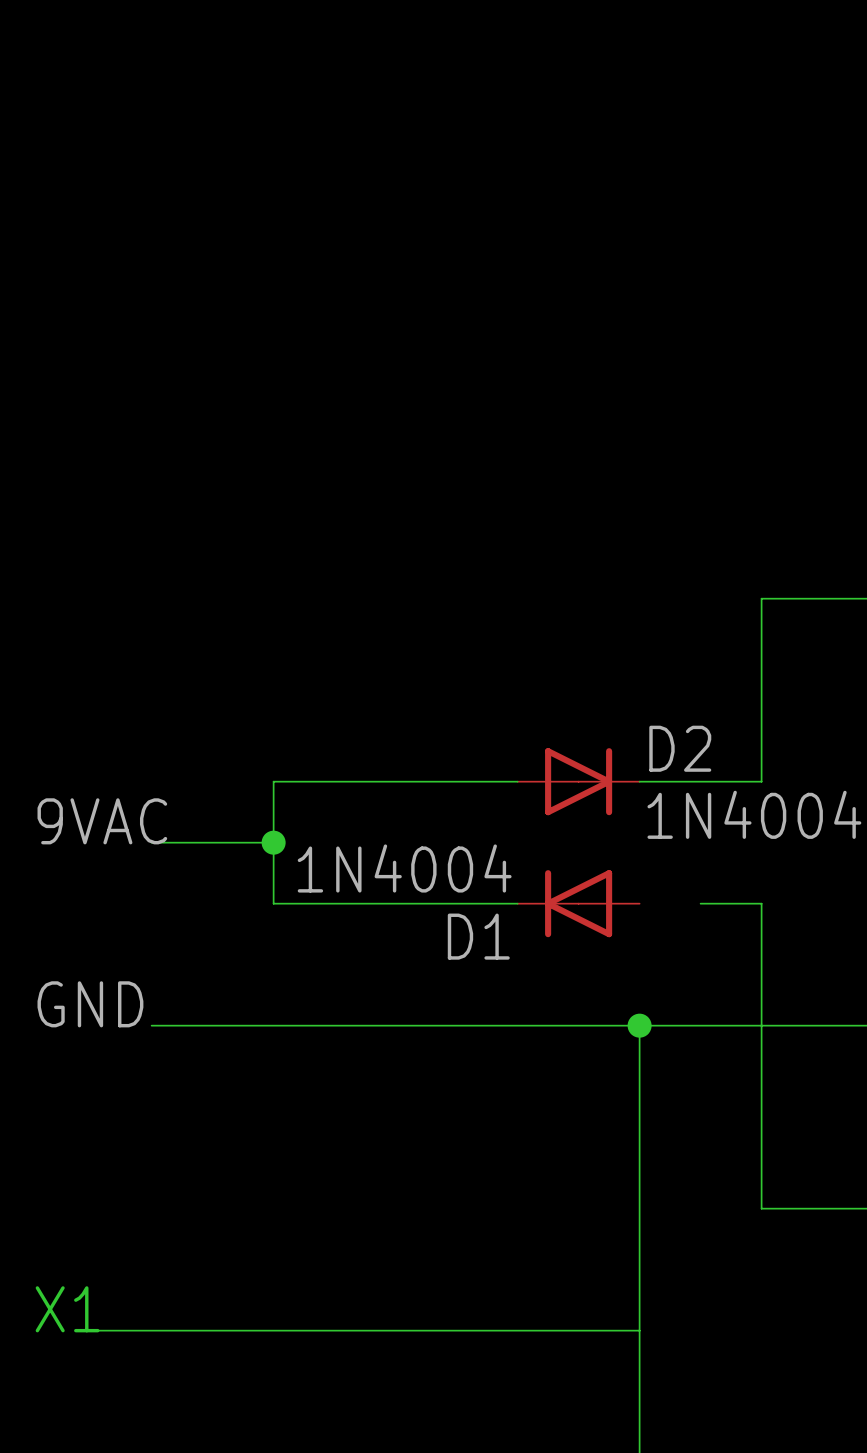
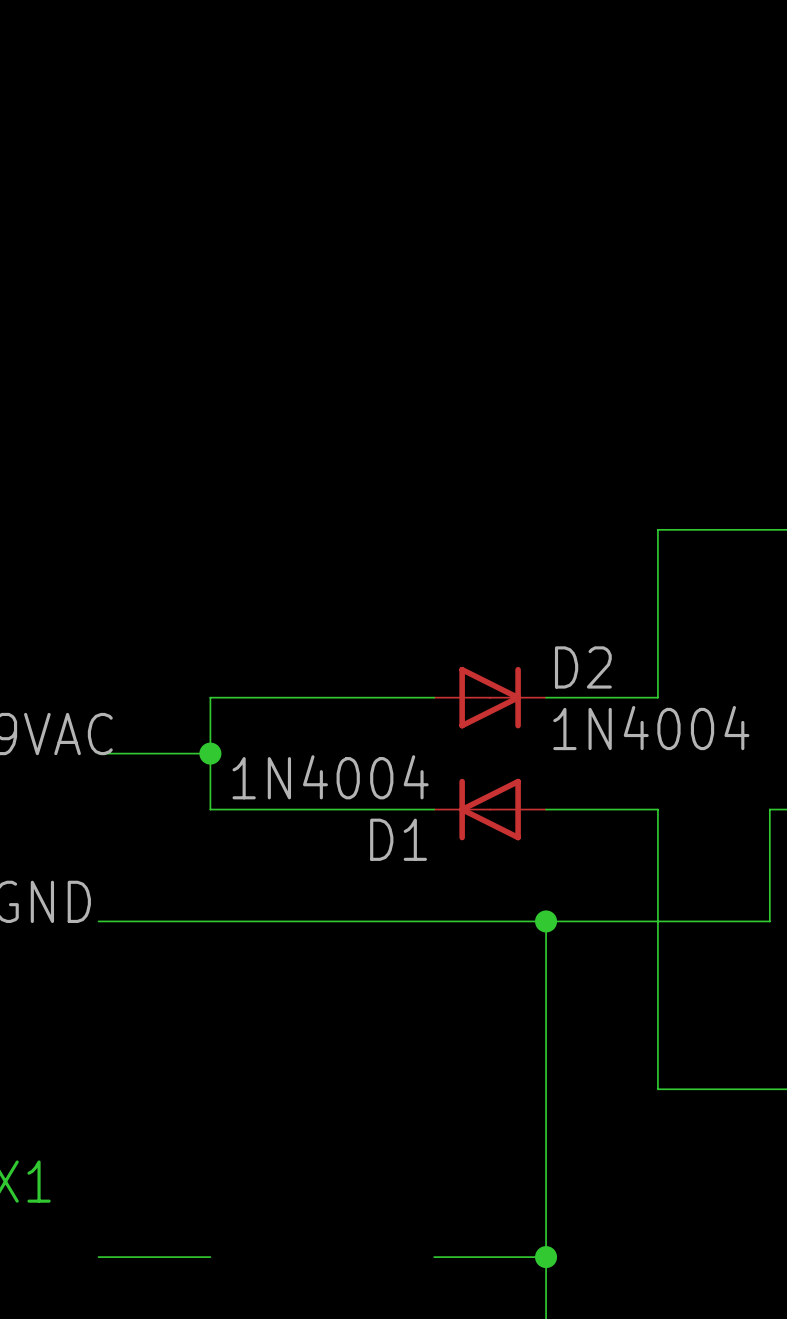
wire: none -> (546, 809) (602, 809)
wire: (90, 1330) (639, 1330) -> none
wire: none -> (98, 1257) (210, 1257)
wire: none -> (434, 1257) (546, 1257)
junction: none -> (546, 1257)

